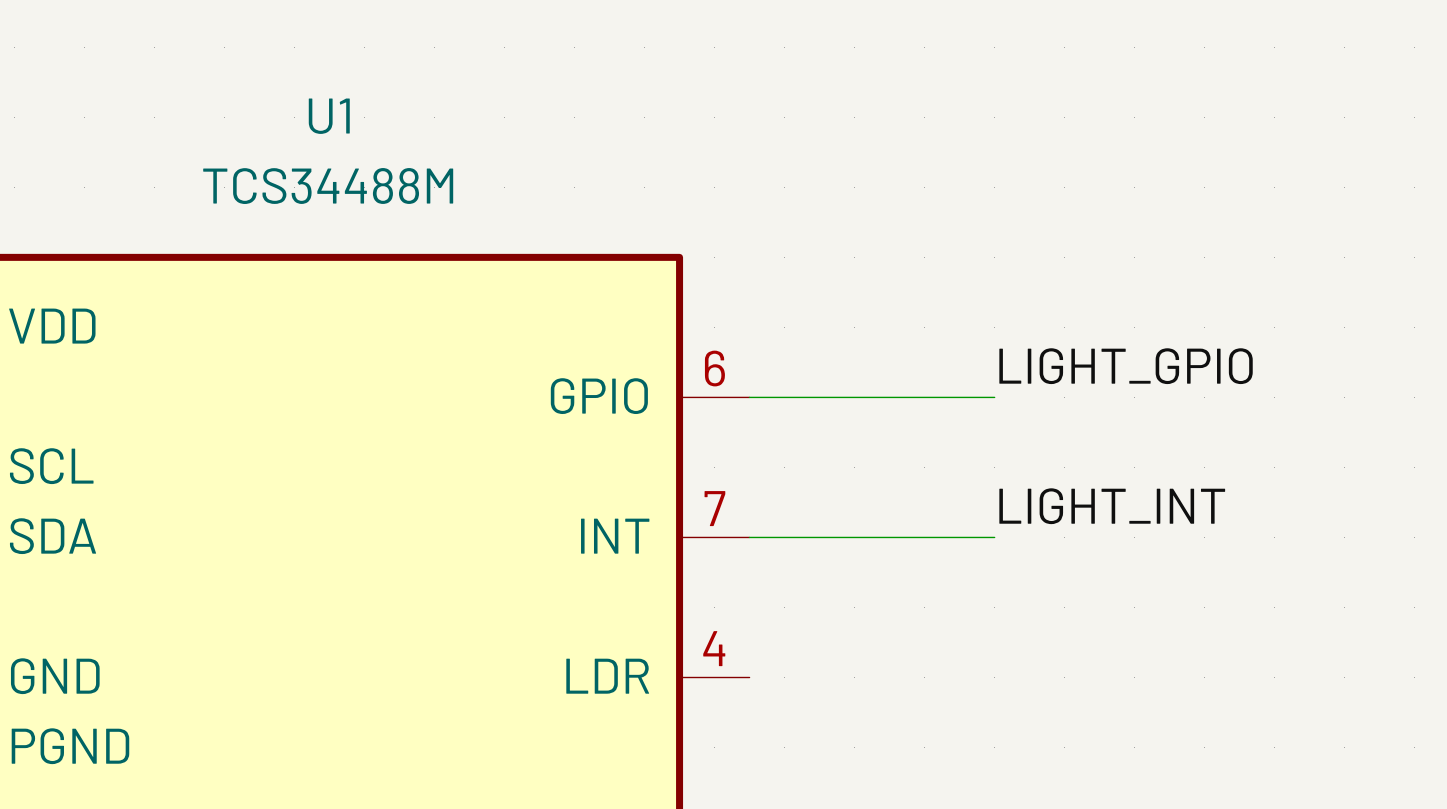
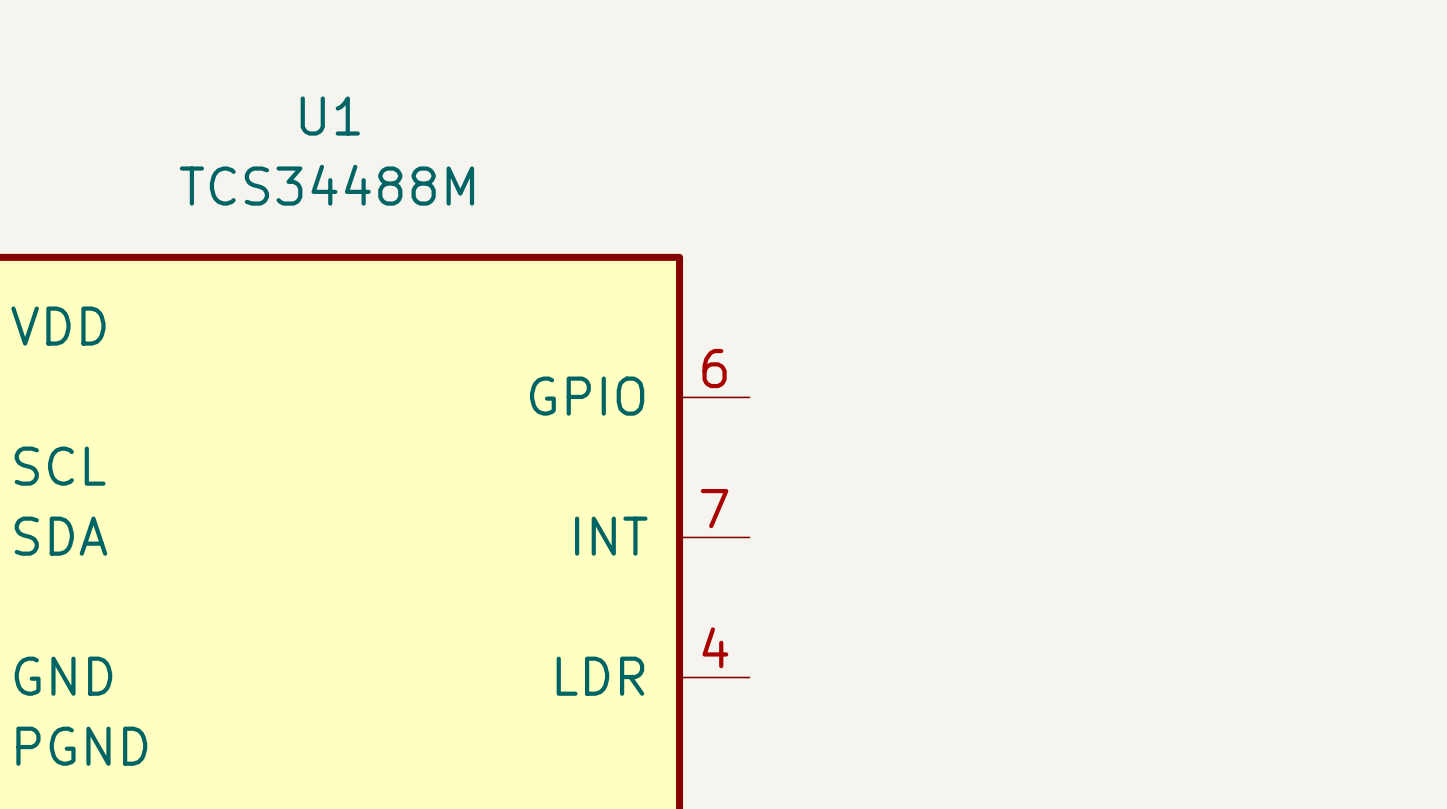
label: LIGHT_GPIO (1126, 366) -> none
wire: (749, 397) (994, 397) -> none
label: LIGHT_INT (1112, 506) -> none
wire: (749, 537) (994, 537) -> none

